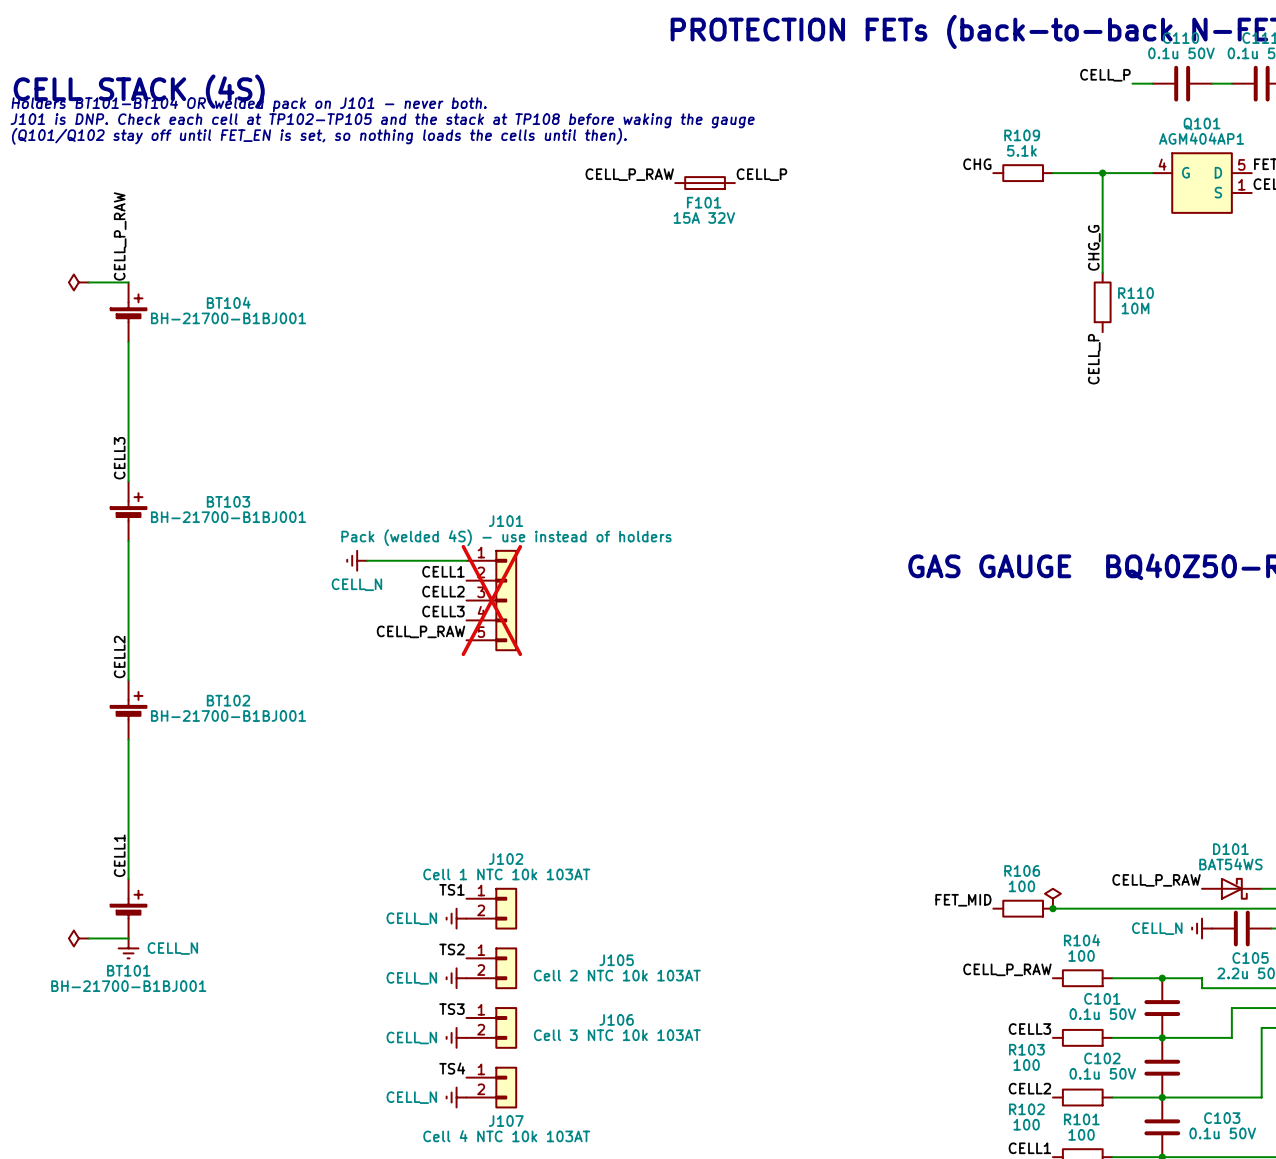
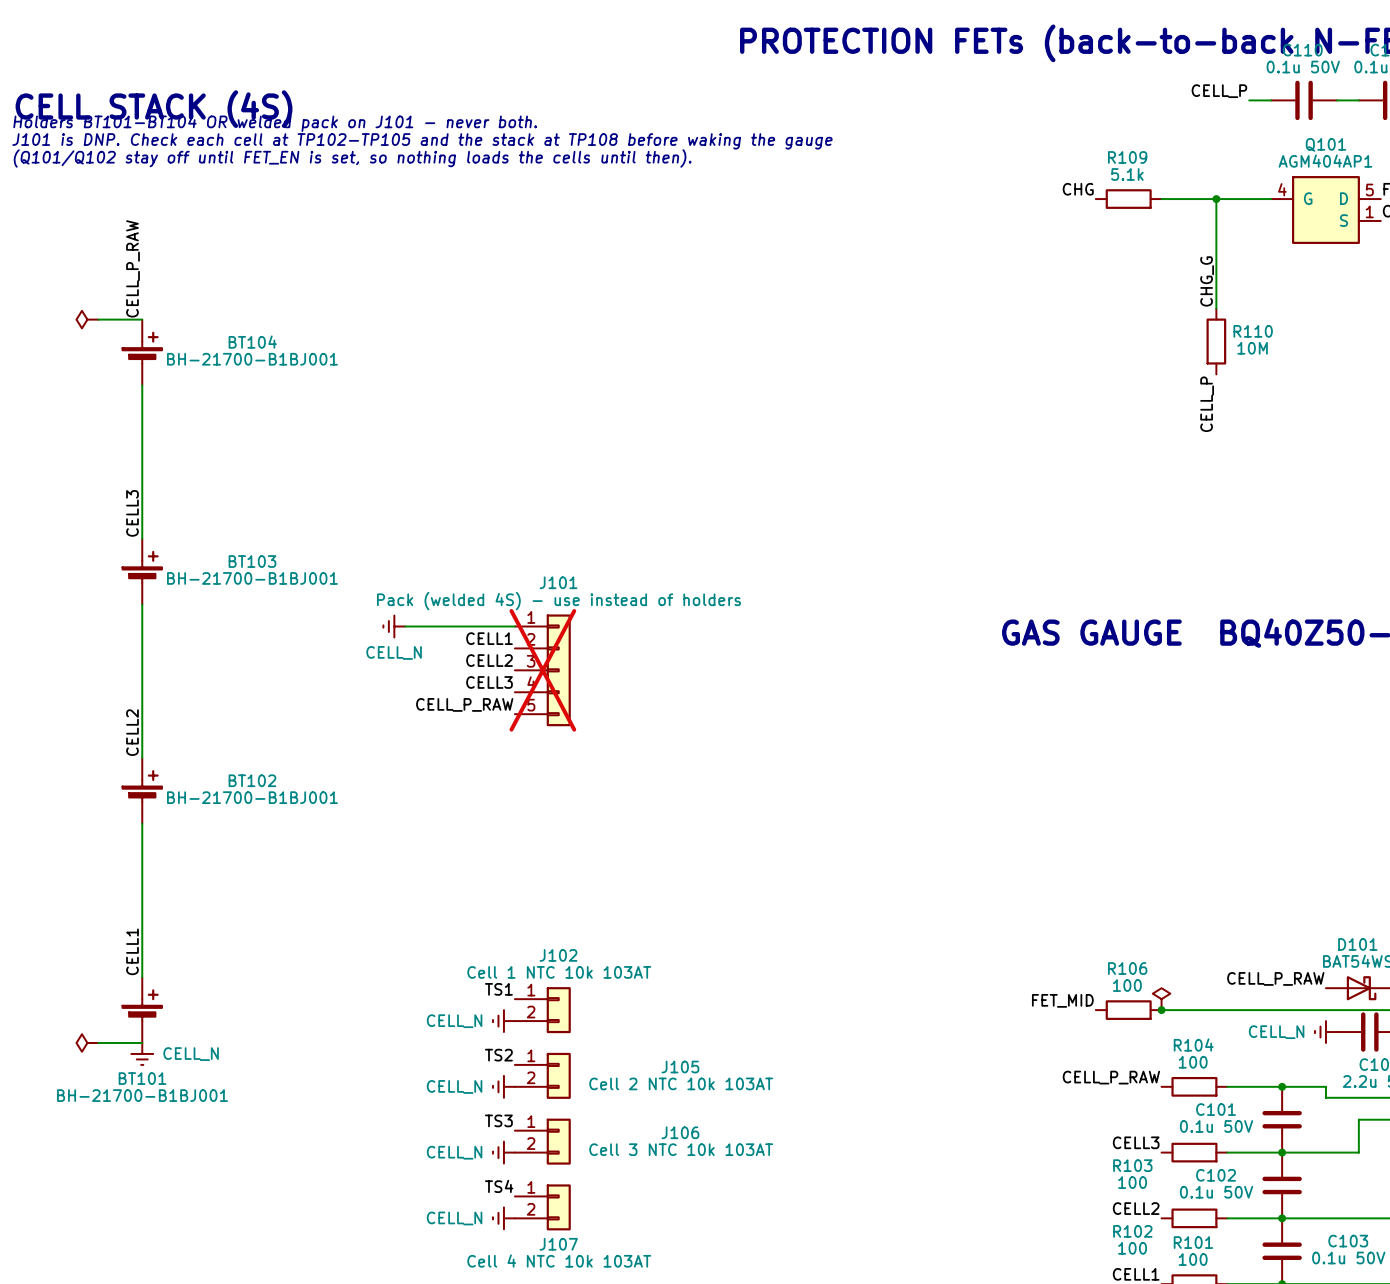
label: CELL_P_RAW (629, 174) -> none
label: CELL_P (761, 174) -> none
F101: 15A 32V (705, 183) -> none

